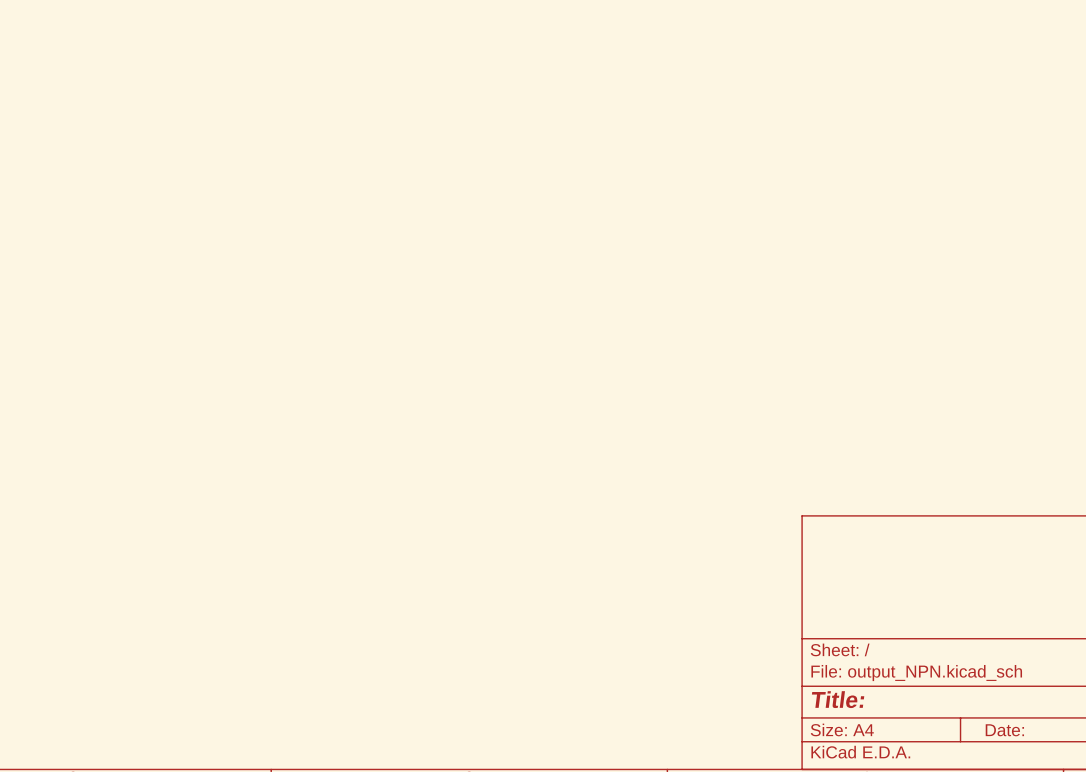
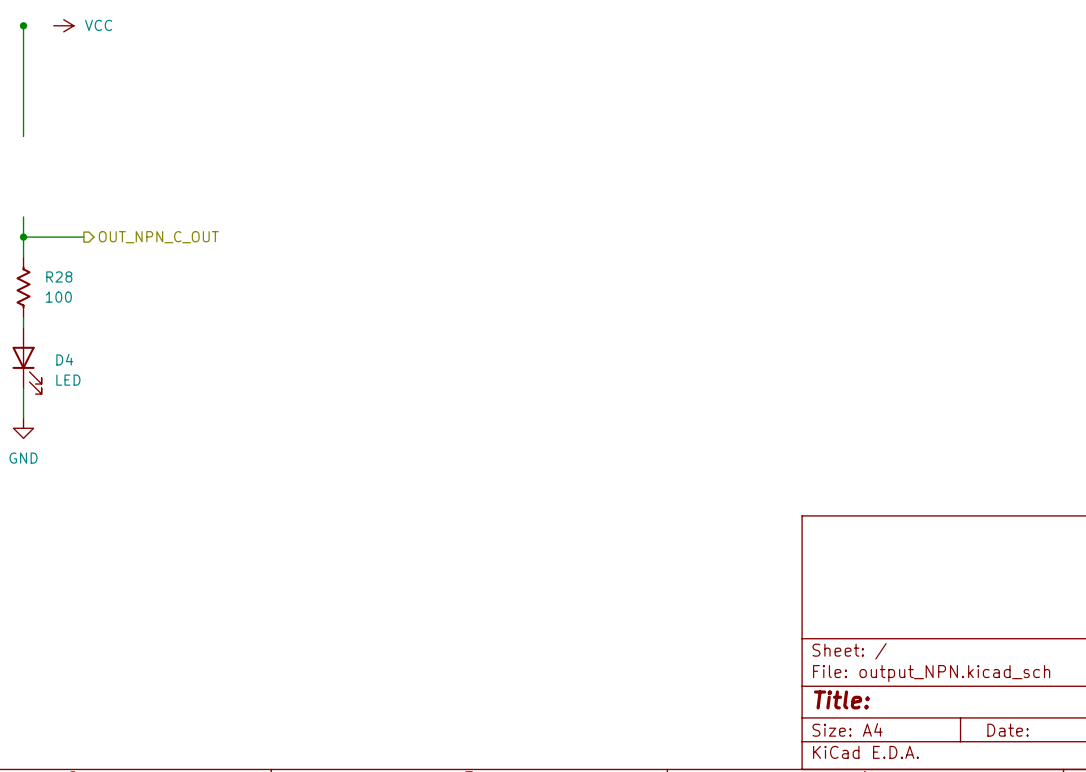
wire: none -> (23, 25) (23, 136)
junction: none -> (23, 25)
power symbol: none -> VCC (63, 25)
wire: none -> (23, 216) (23, 257)
wire: none -> (23, 237) (83, 237)
junction: none -> (23, 237)
hierarchical label: none -> OUT_NPN_C_OUT (158, 237)
R28: none -> 100 (23, 287)
wire: none -> (23, 317) (23, 327)
D4: none -> LED (27, 360)
wire: none -> (23, 388) (23, 418)
power symbol: none -> GND (23, 428)

